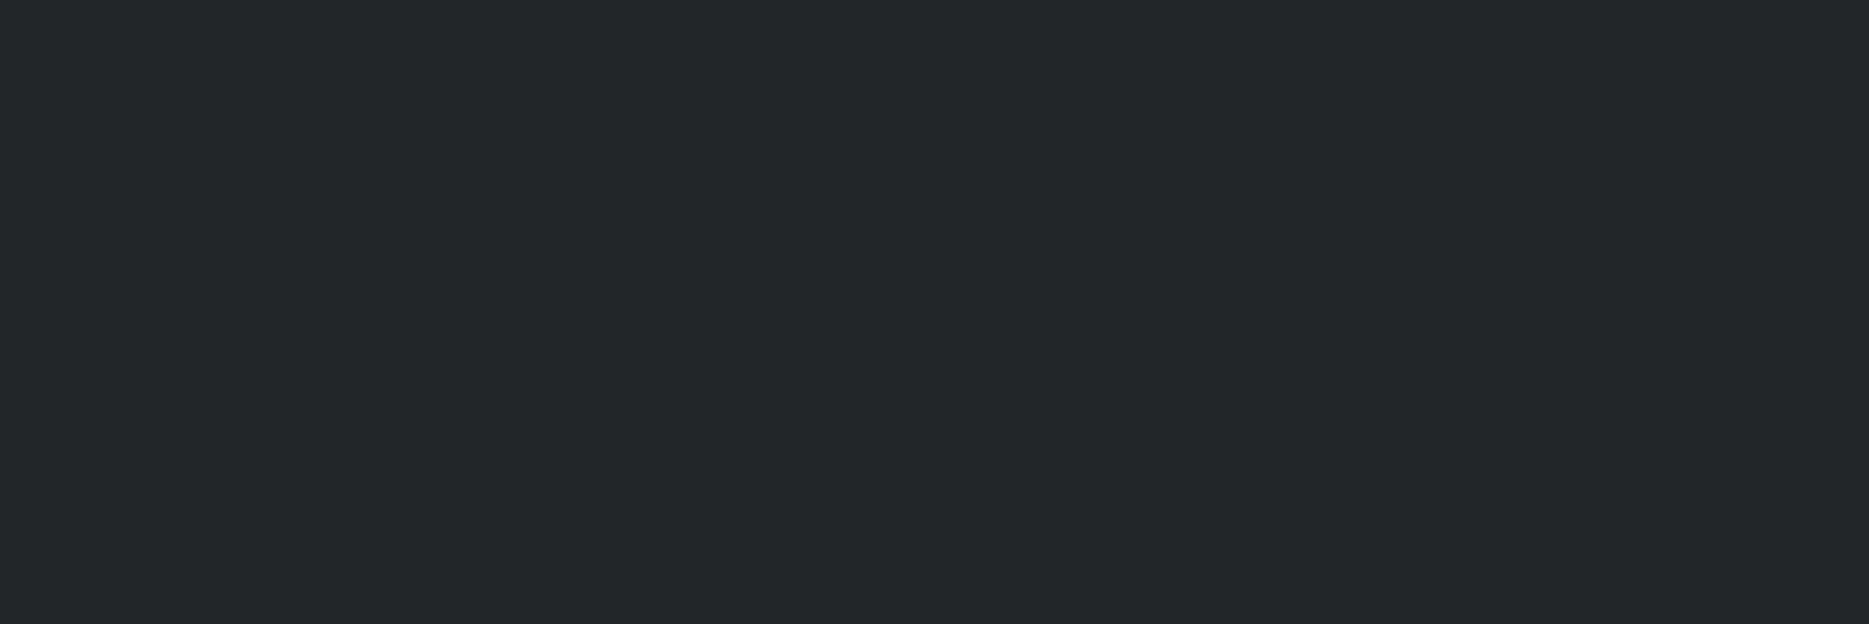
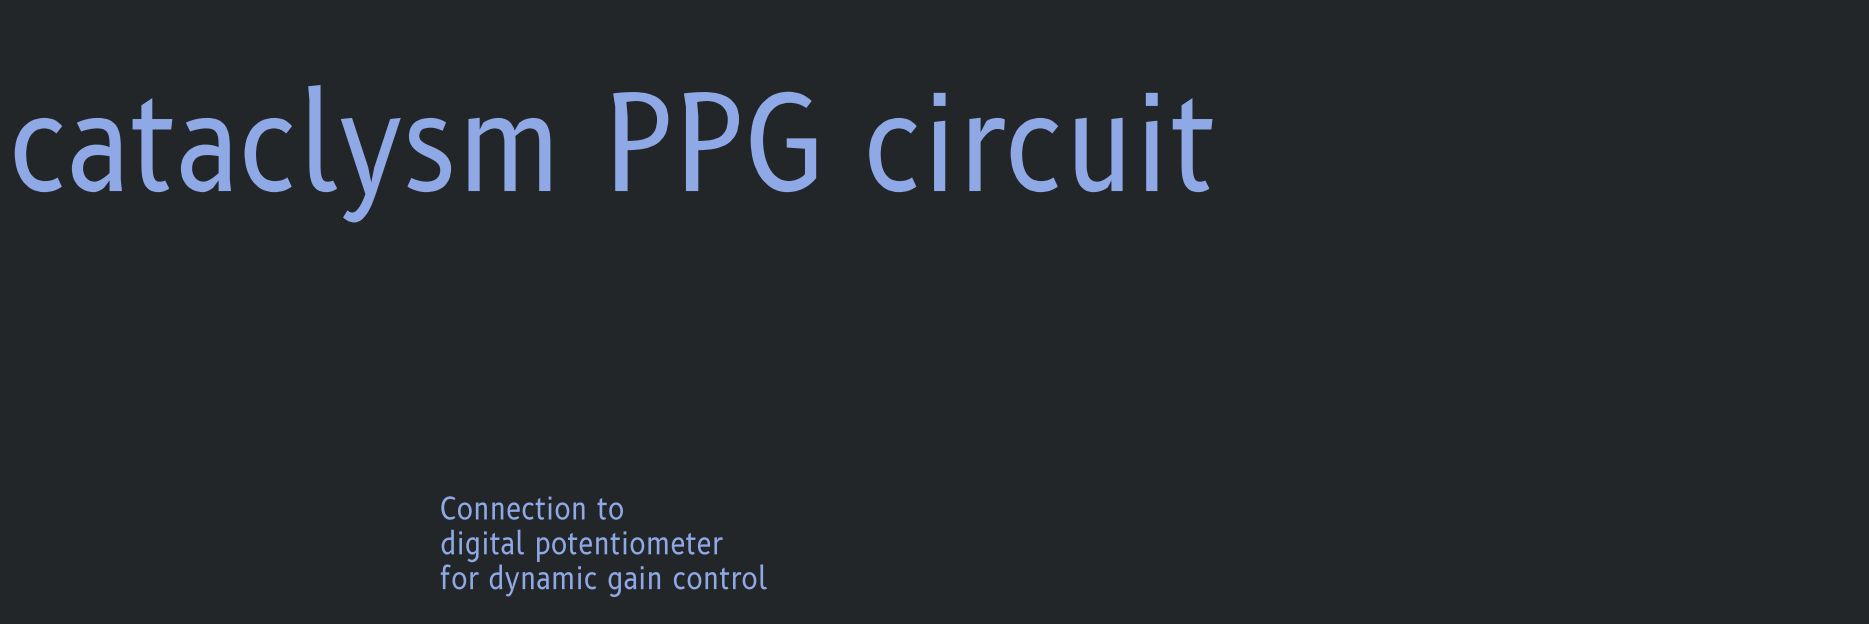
text: none -> cataclysm PPG circuit (613, 153)
text: none -> Connection to (532, 508)
text: none -> digital potentiometer (582, 545)
text: none -> for dynamic gain control (603, 580)

